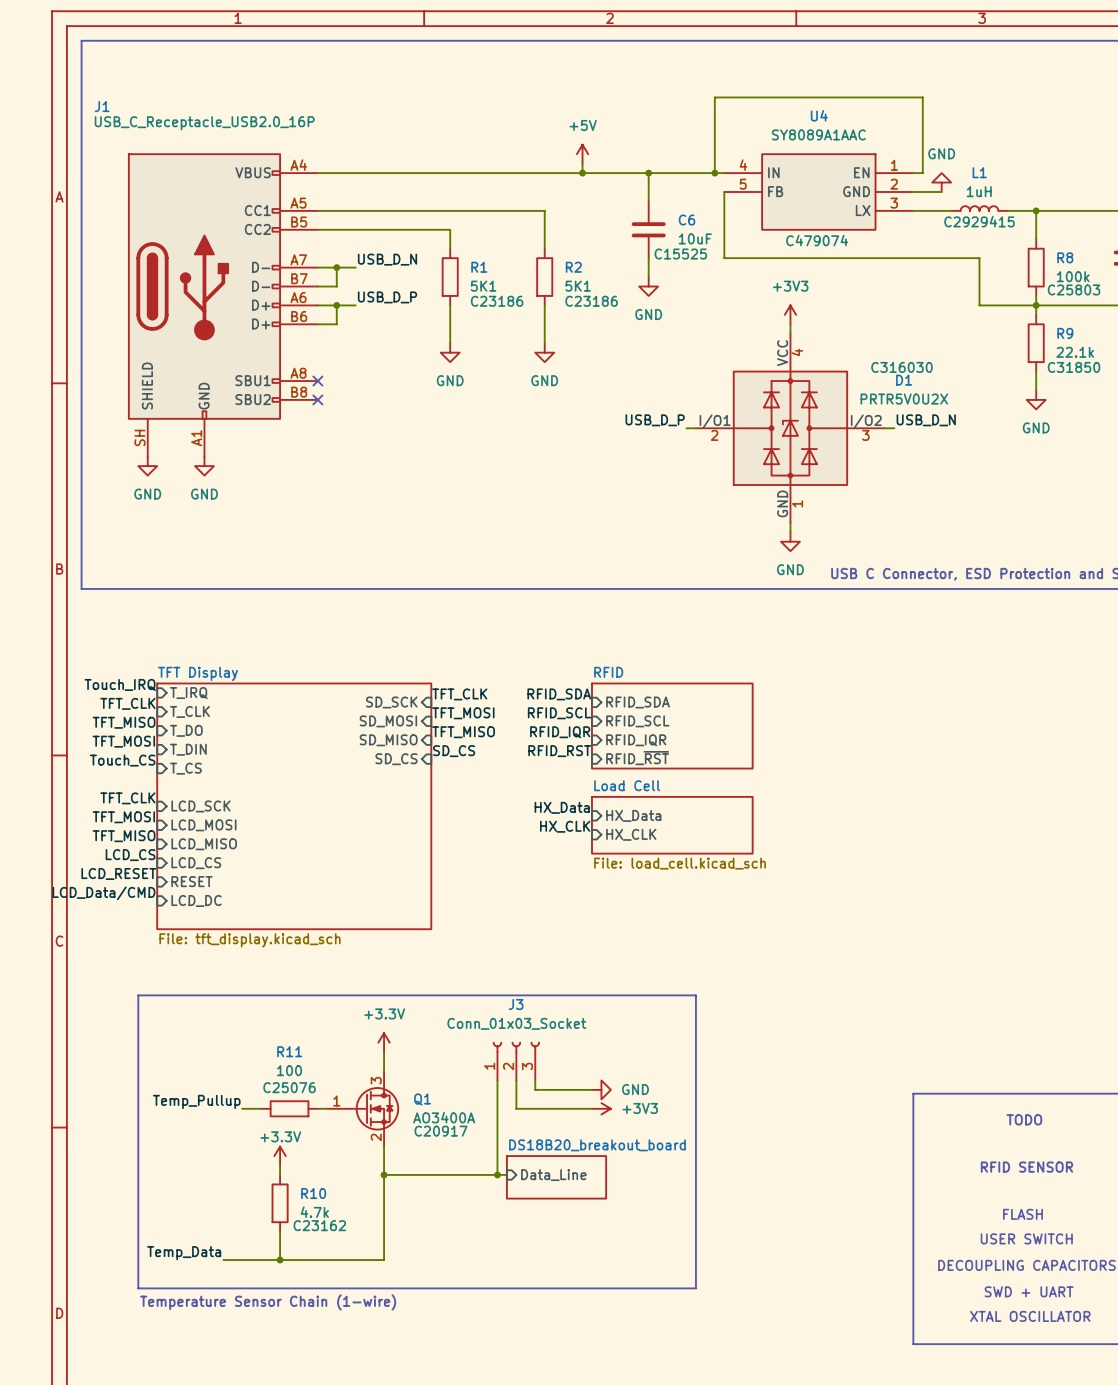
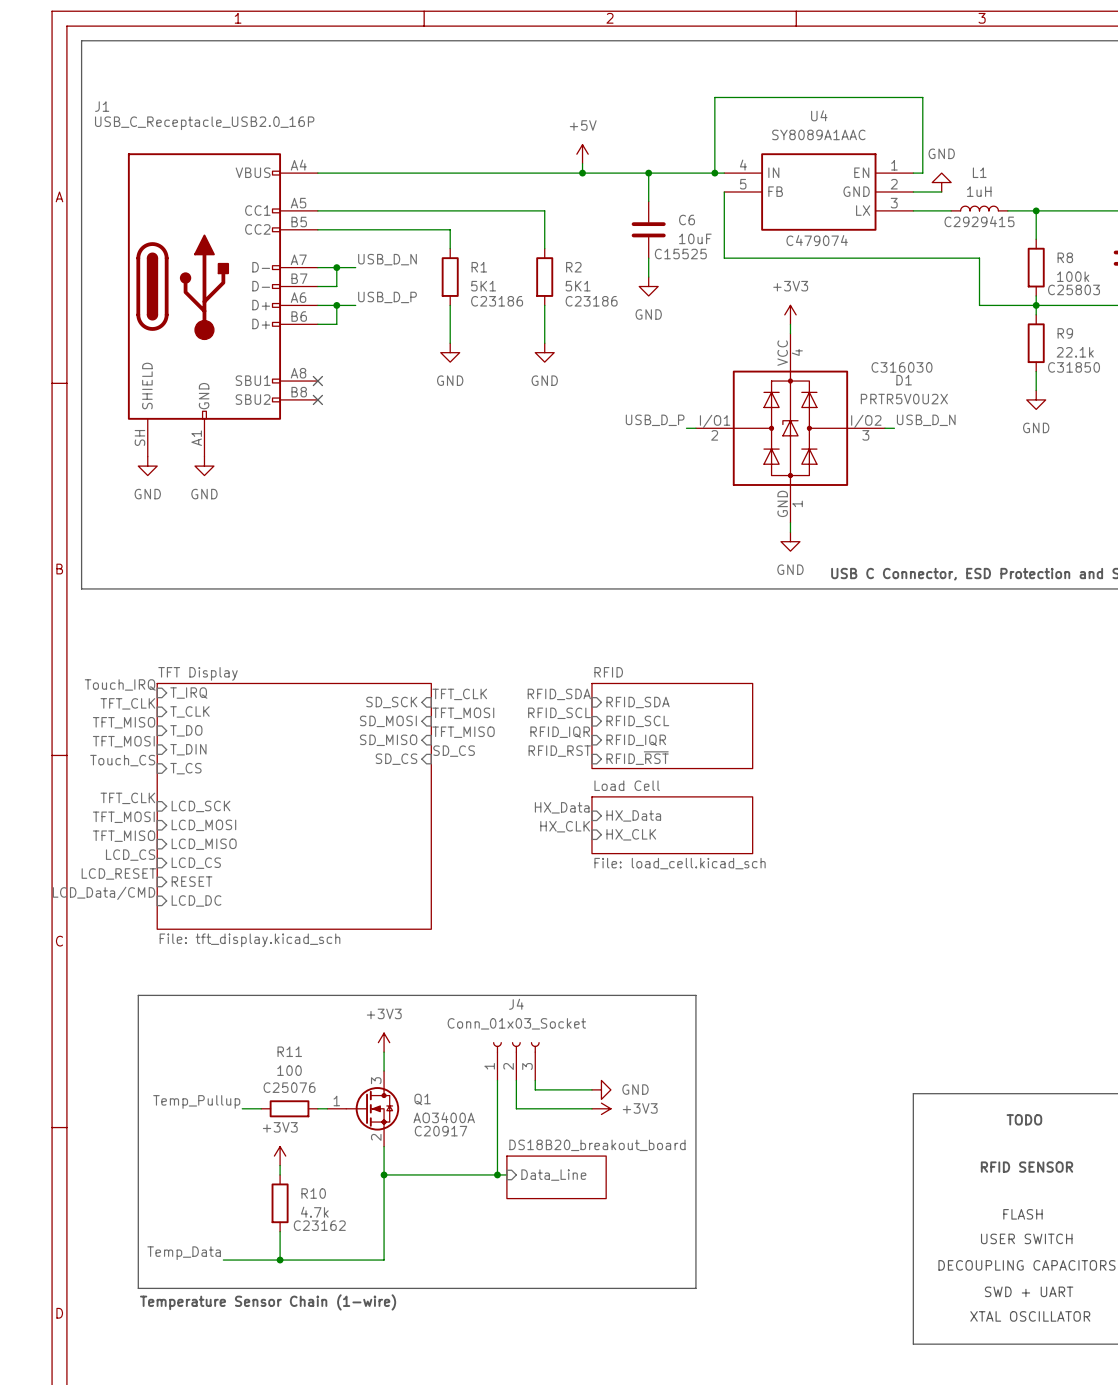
J3 name: J3 (516, 1004) -> J4 (516, 1004)
power symbol: +3.3V (384, 1042) -> +3V3 (384, 1042)
power symbol: +3.3V (280, 1156) -> +3V3 (280, 1156)

